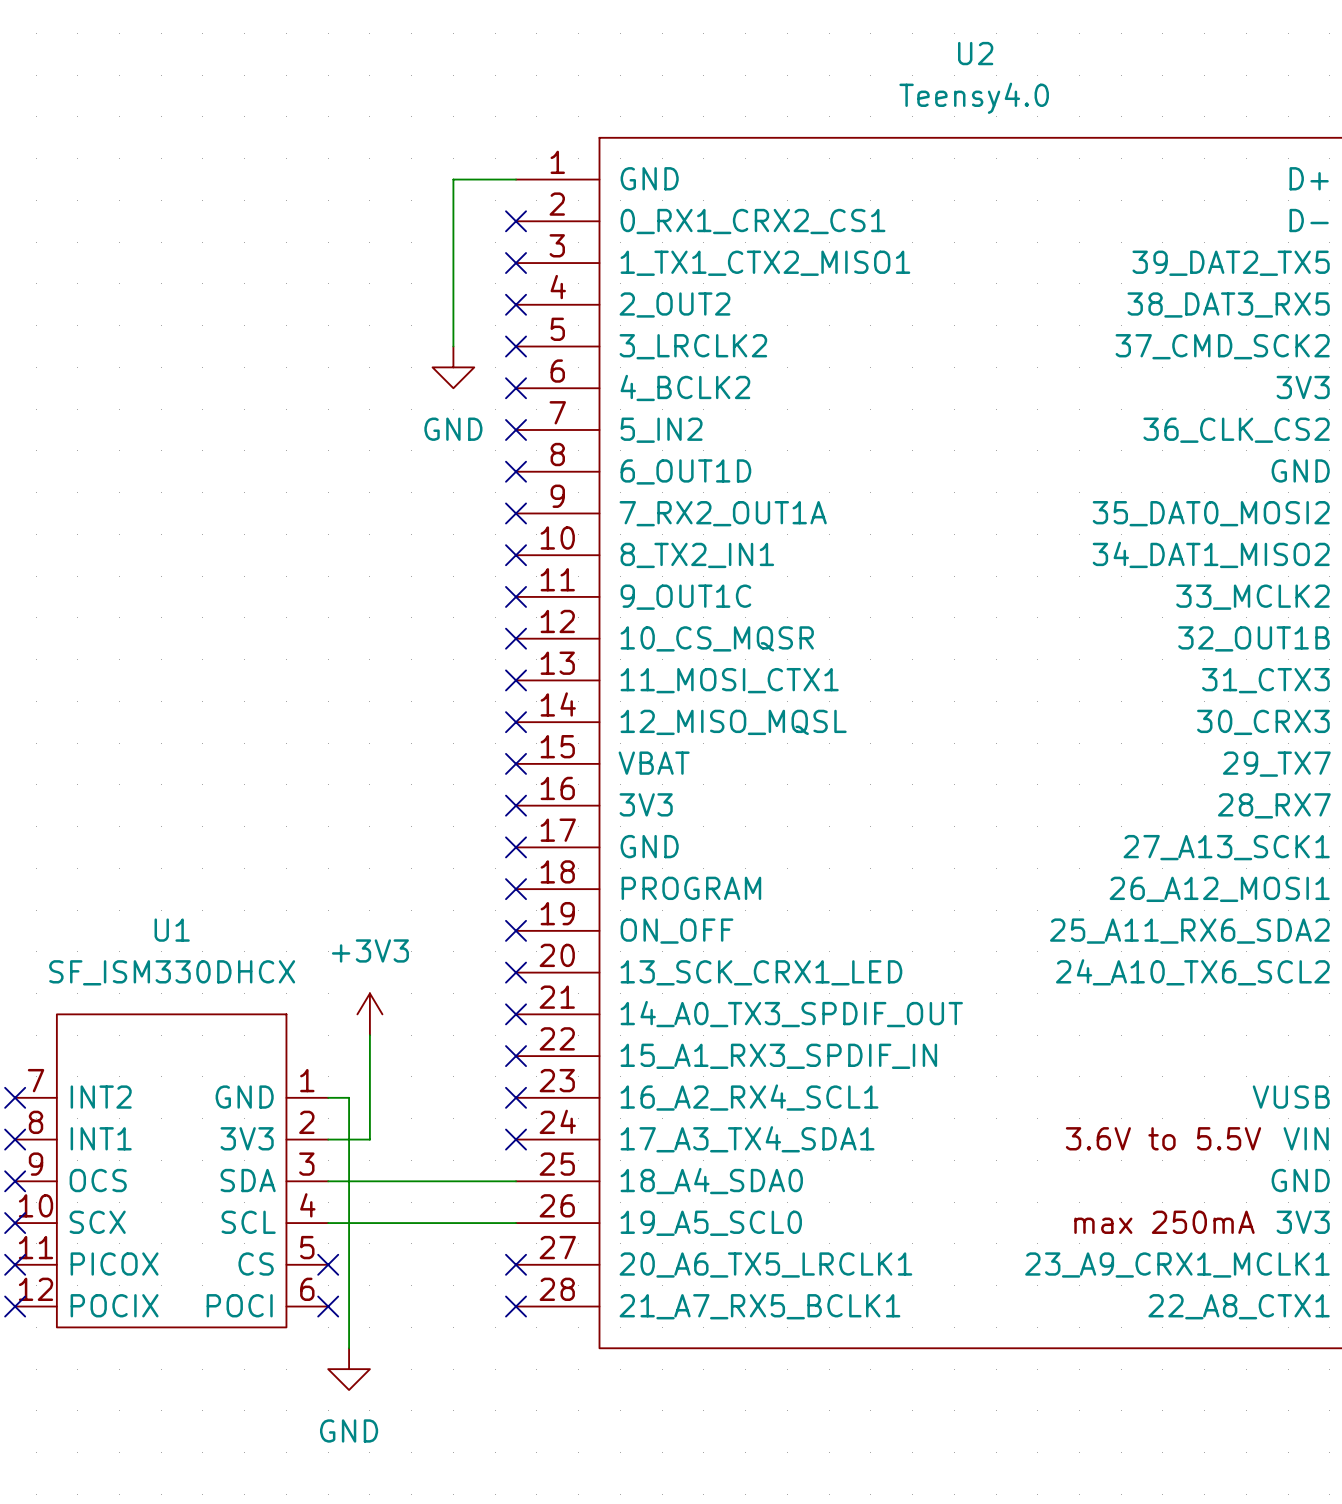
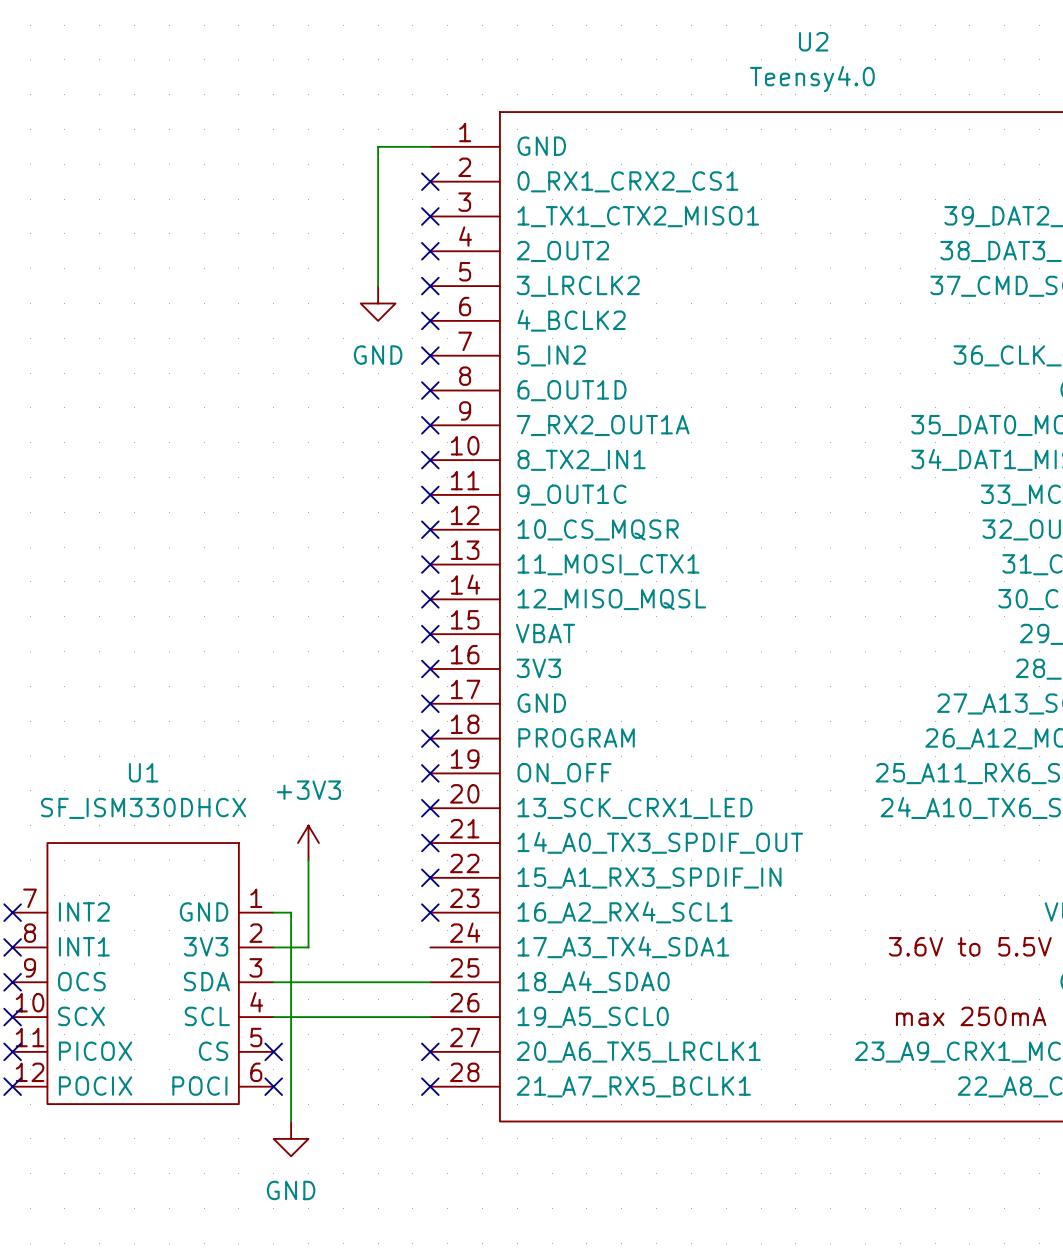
no-connect mark: (516, 1139) -> none

